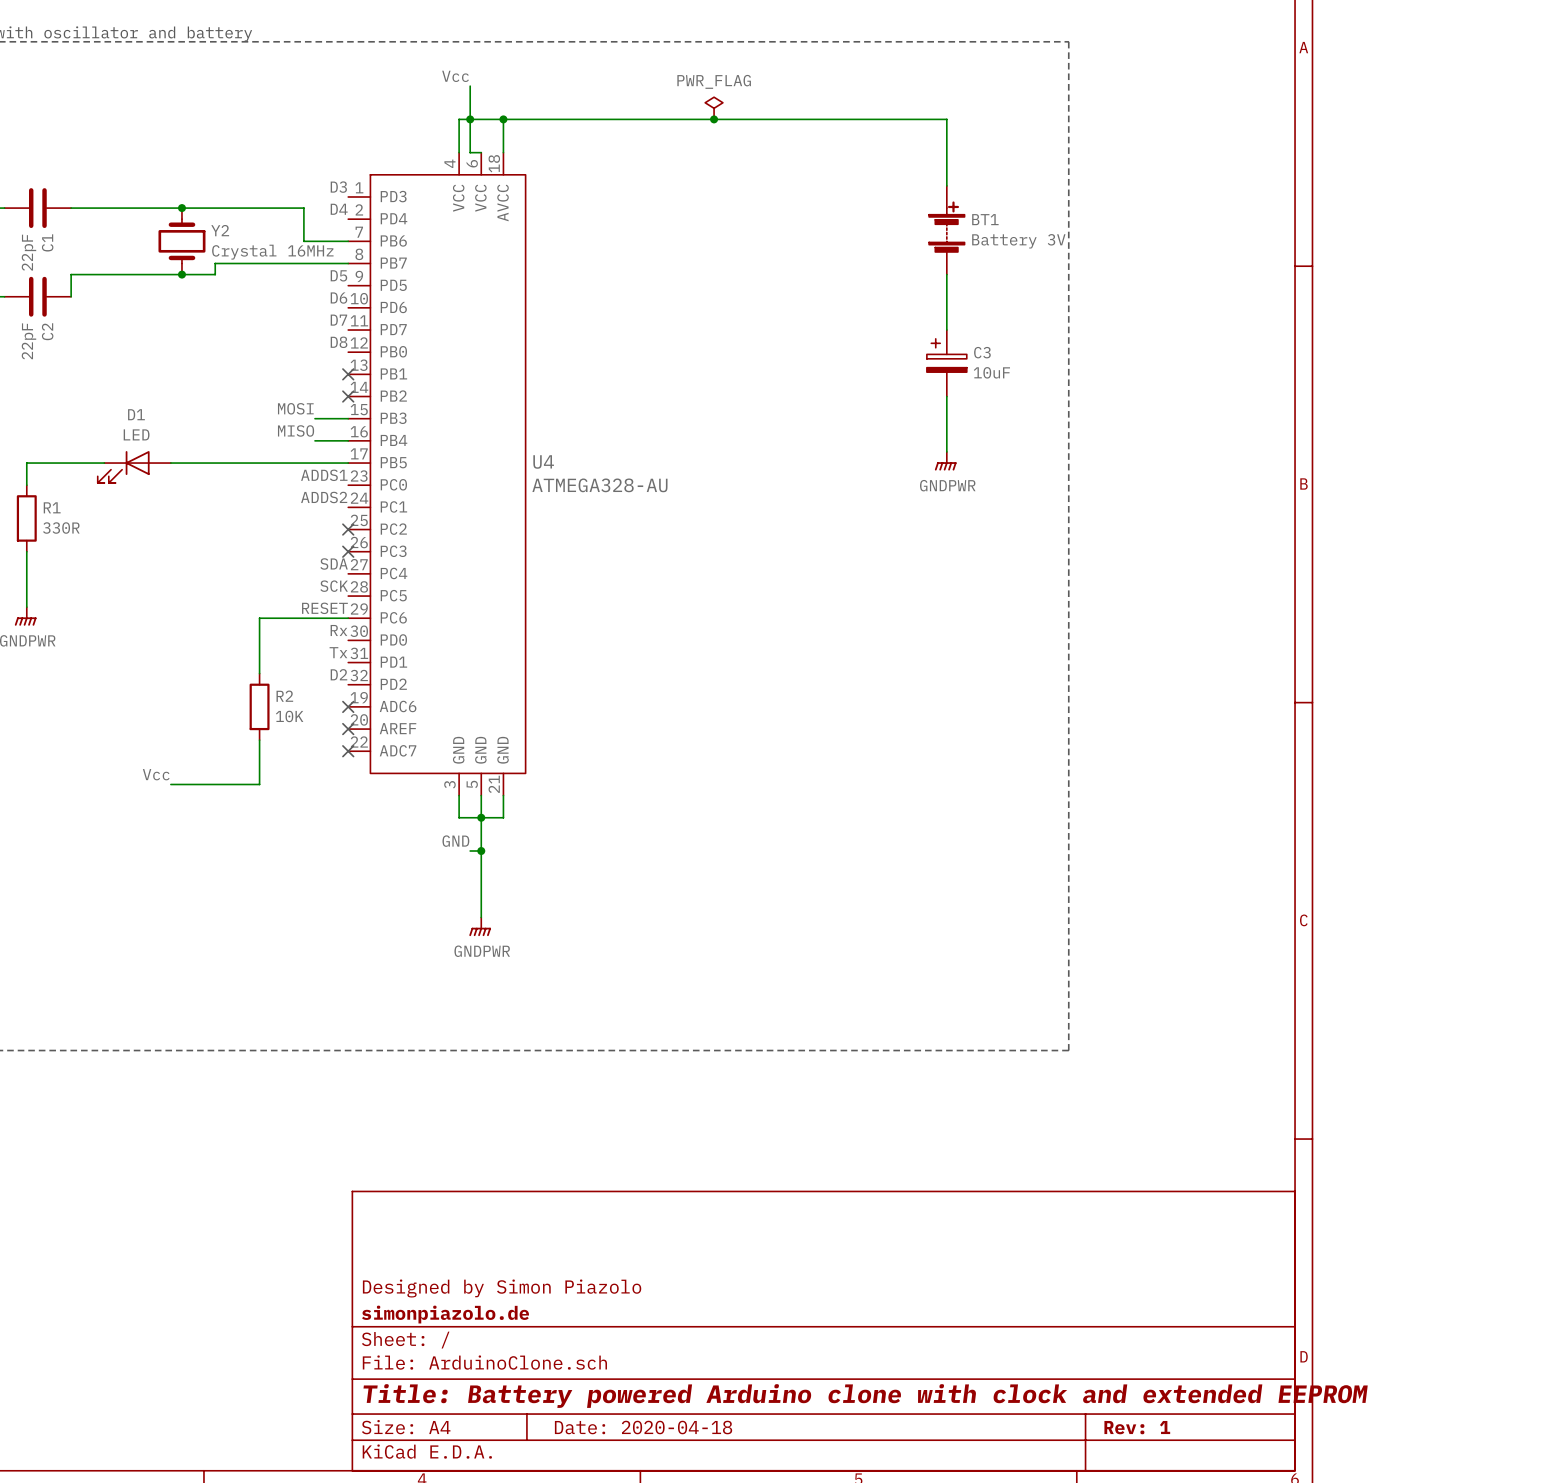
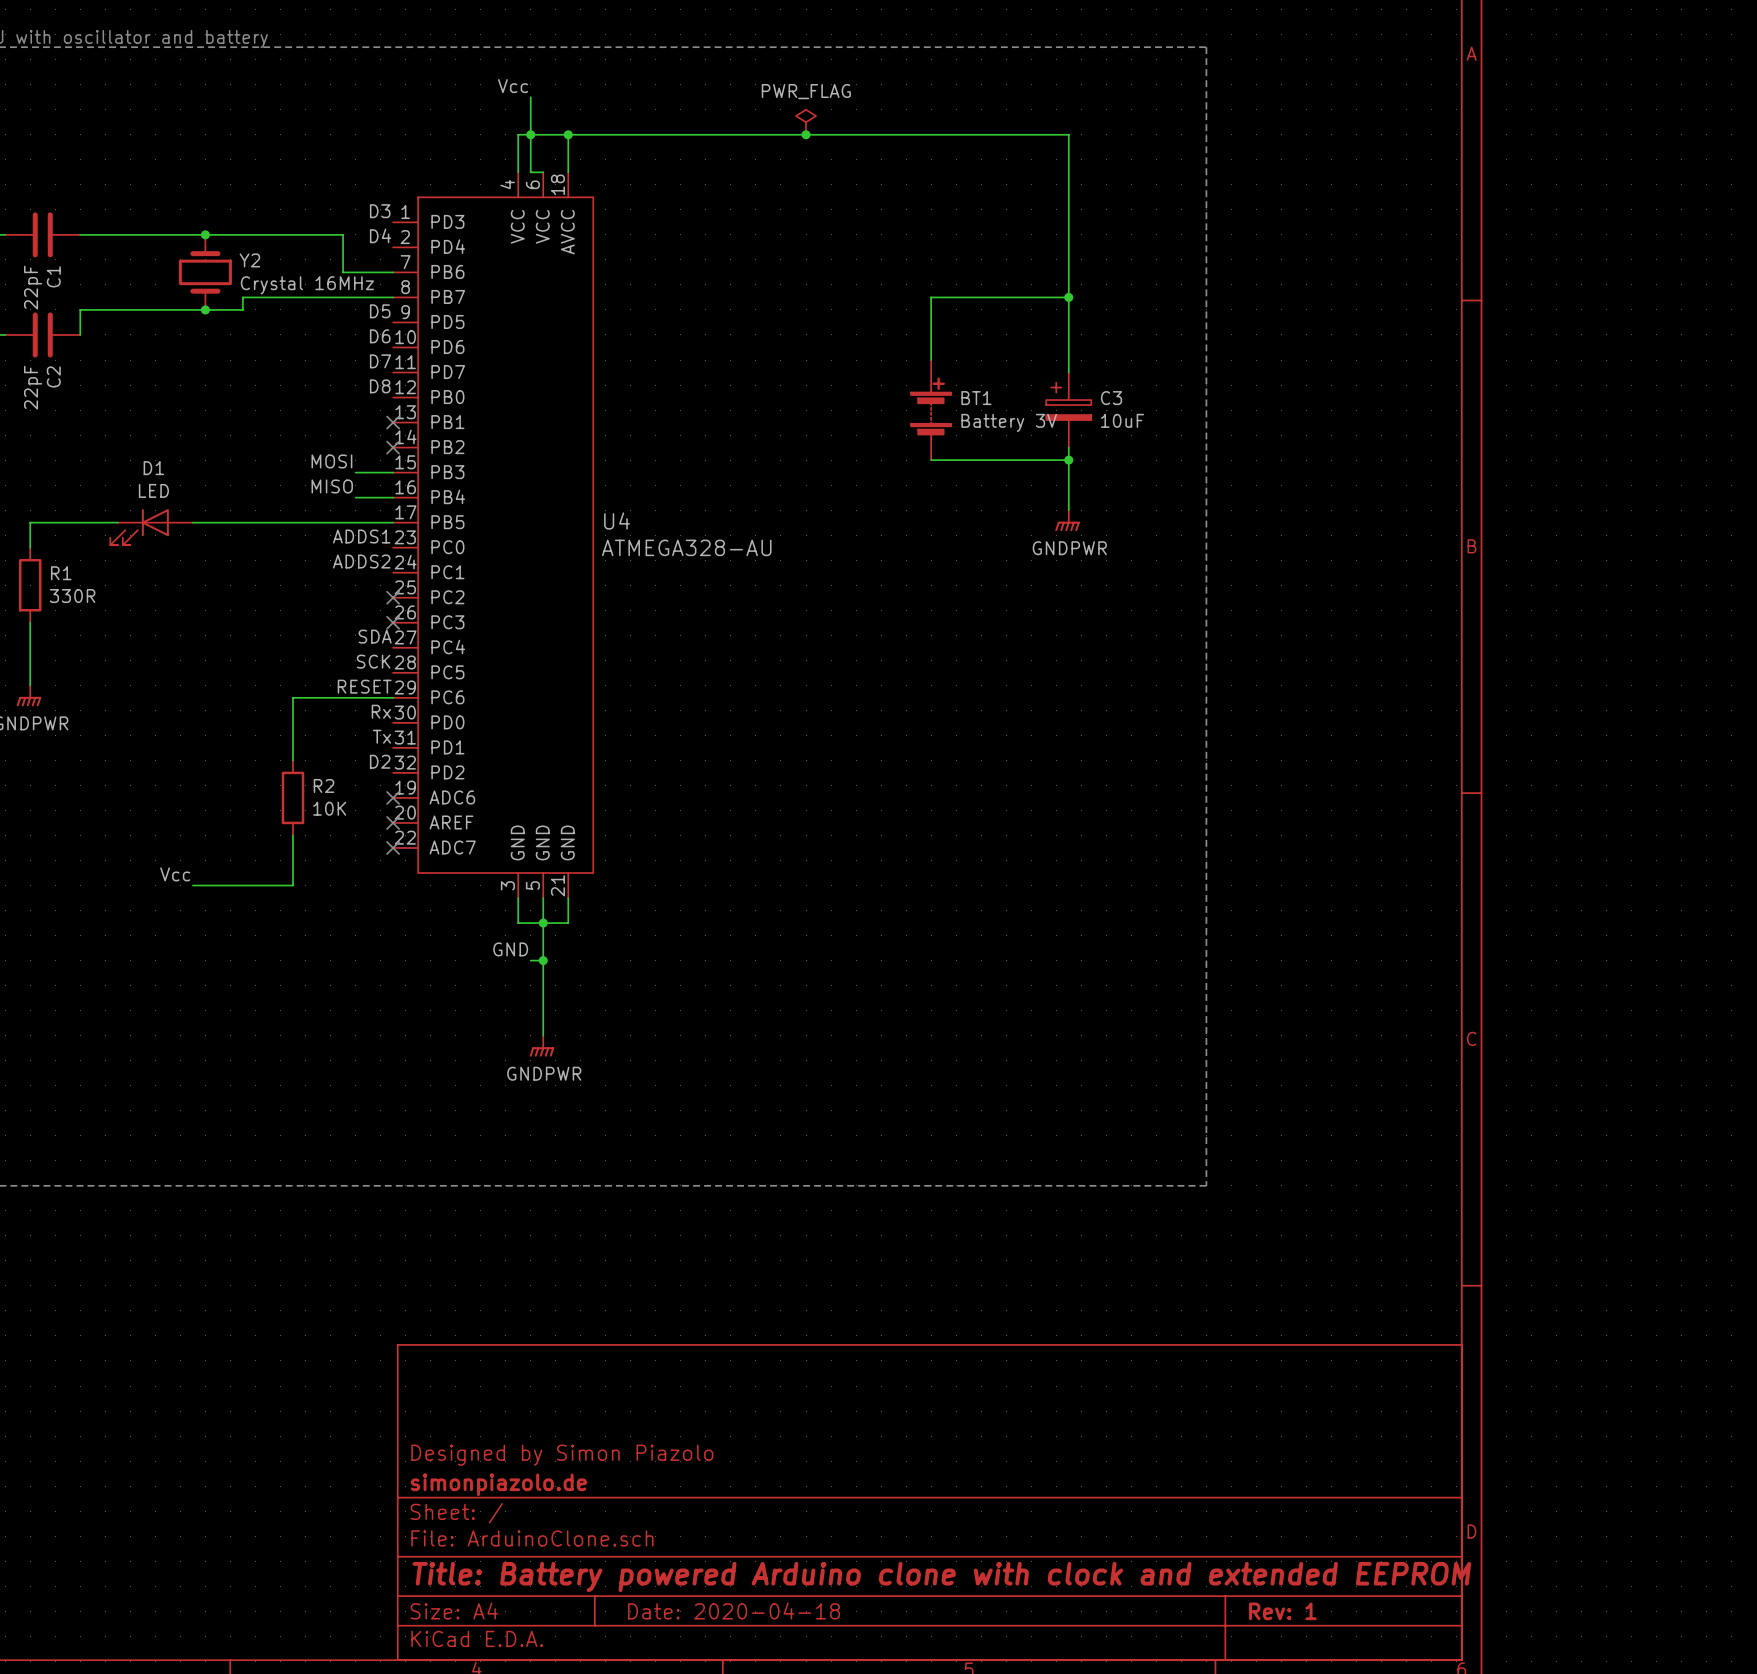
BT1 position: (946, 230) -> (931, 410)
wire: none -> (1068, 297) (931, 297) (931, 360)
junction: none -> (1068, 297)
wire: none -> (931, 460) (1068, 460)
junction: none -> (1068, 460)

